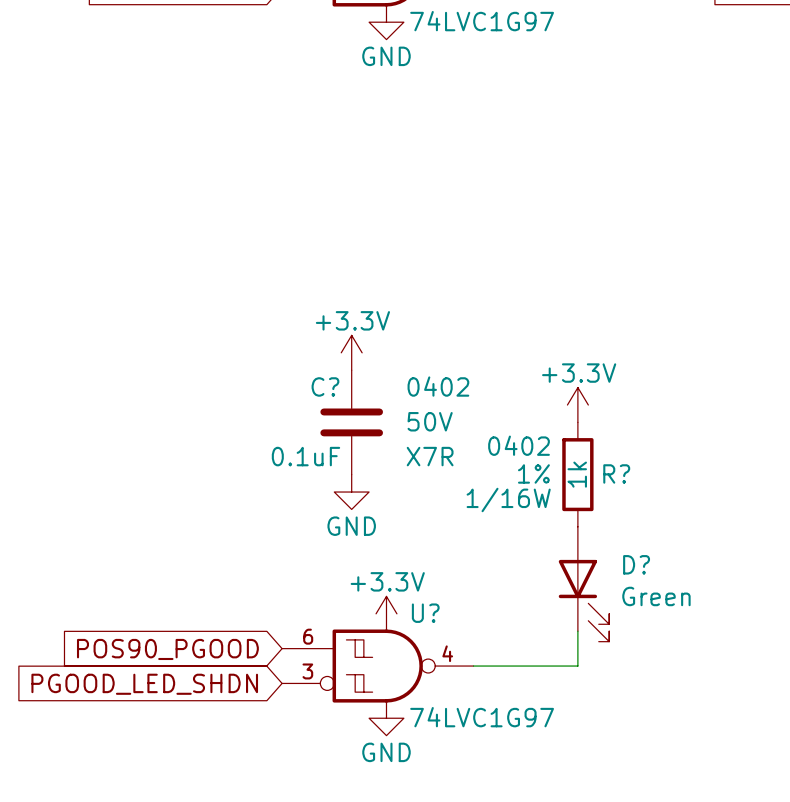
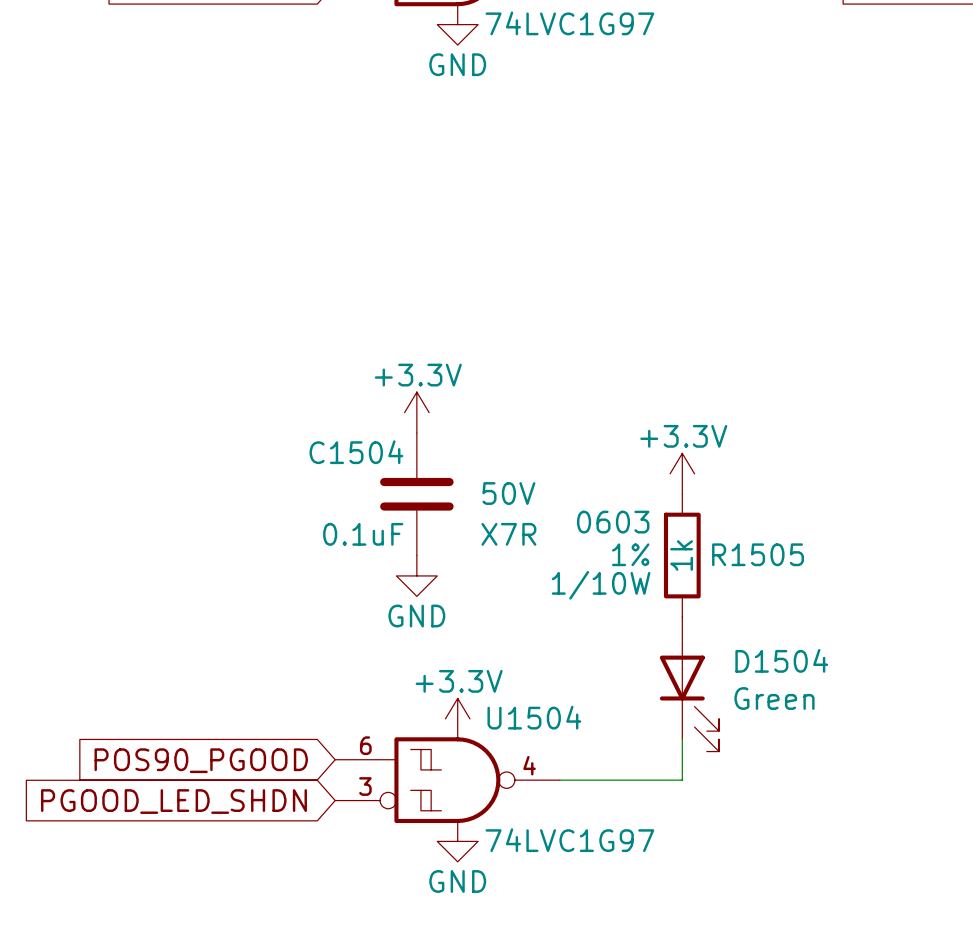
C? name: C? (325, 386) -> C1504 (356, 452)
C? text: 0402 (438, 386) -> none
R? text: 0402 (519, 445) -> 0603 (613, 522)
R? name: R? (616, 473) -> R1505 (758, 554)
R? text: 1/16W (508, 499) -> 1/10W (601, 585)
D? name: D? (636, 564) -> D1504 (781, 660)
U? name: U? (425, 613) -> U1504 (534, 717)

